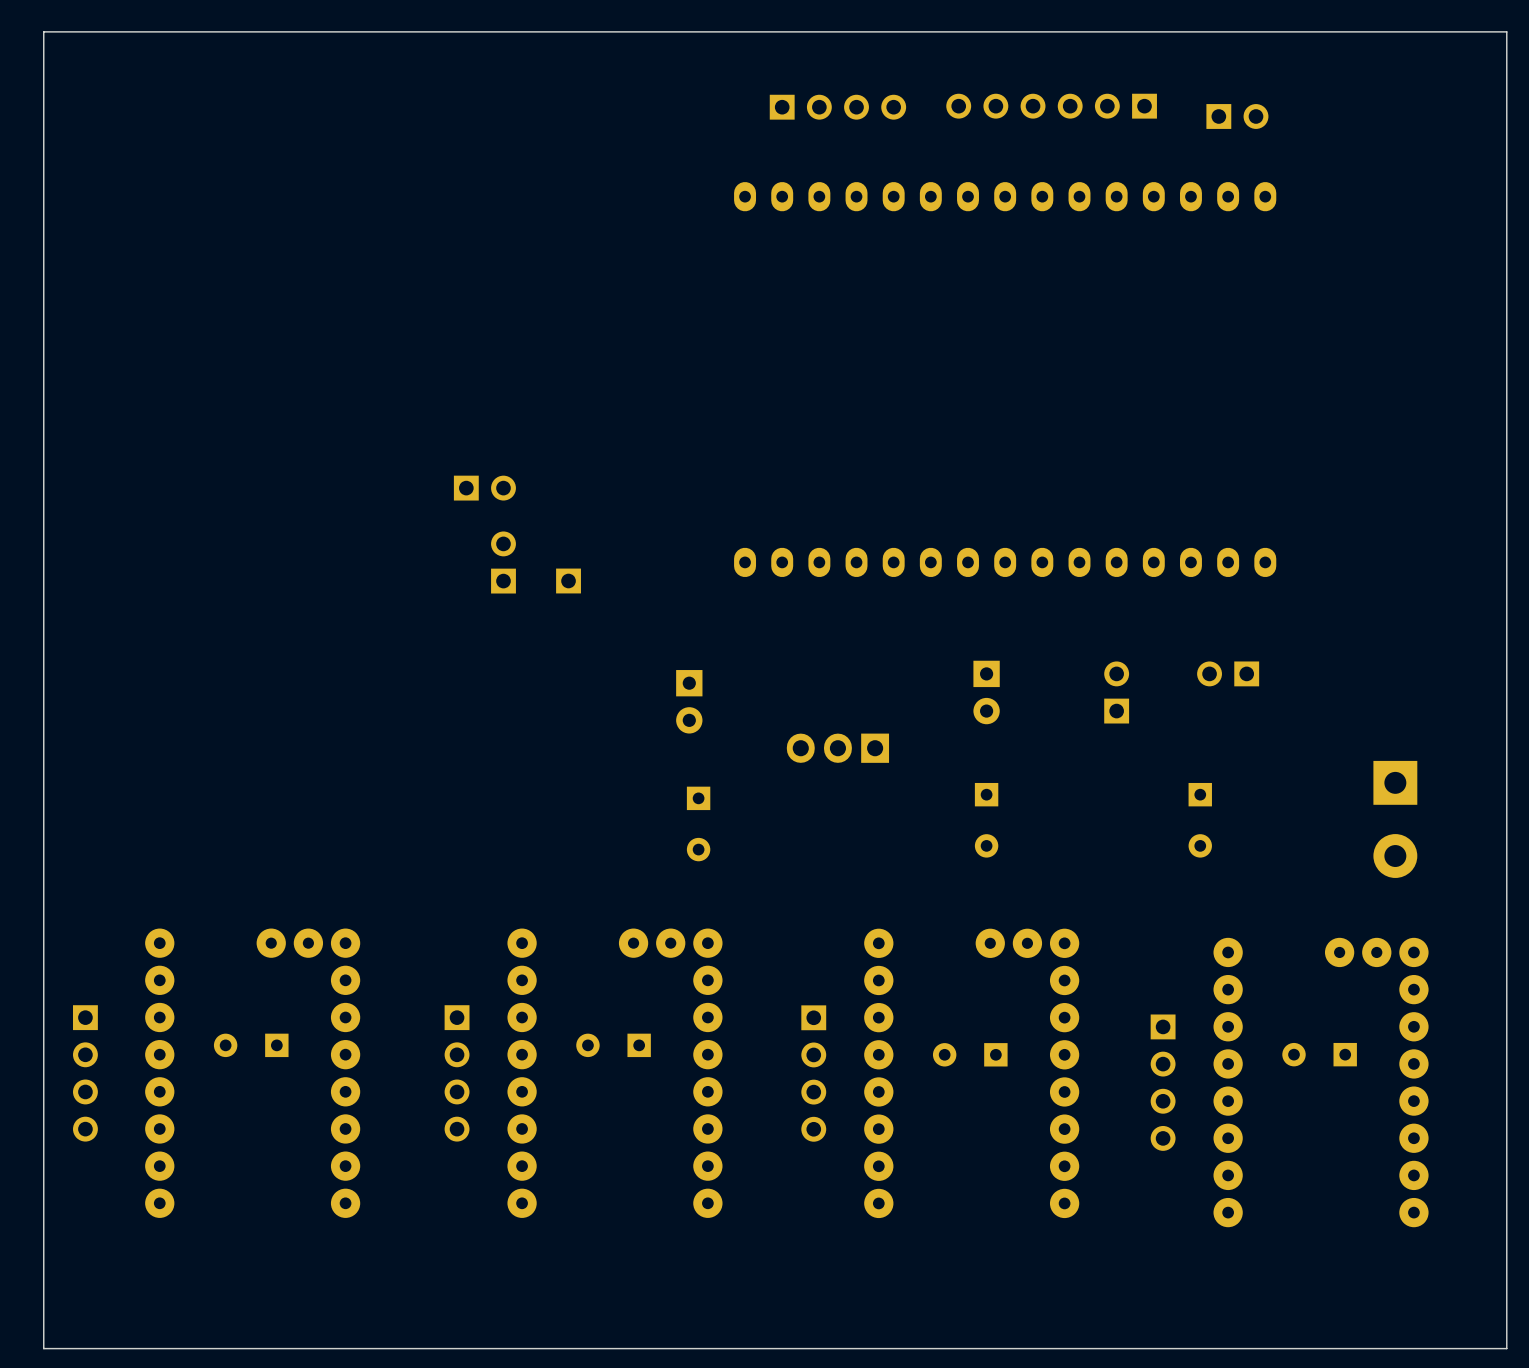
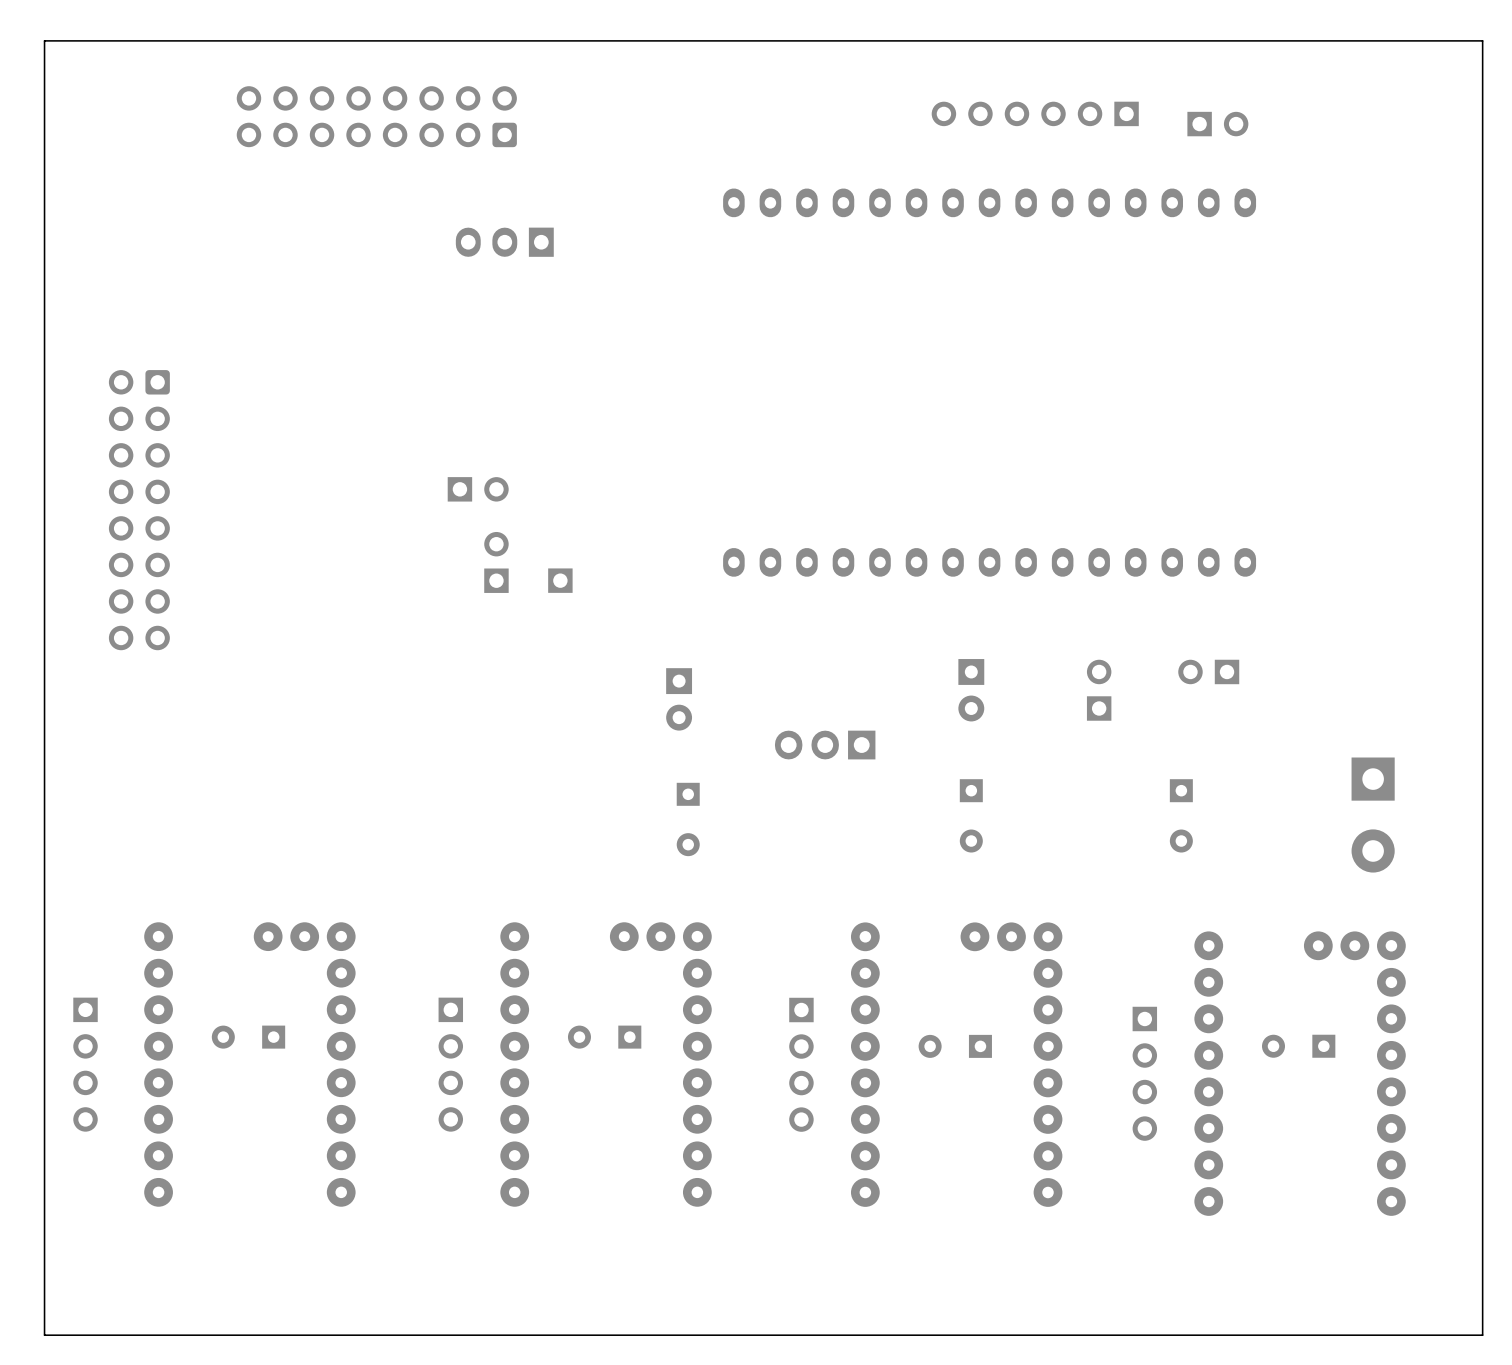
part: (837, 107) -> none
part: none -> (376, 116)
part: none -> (504, 242)
part: none -> (139, 510)

